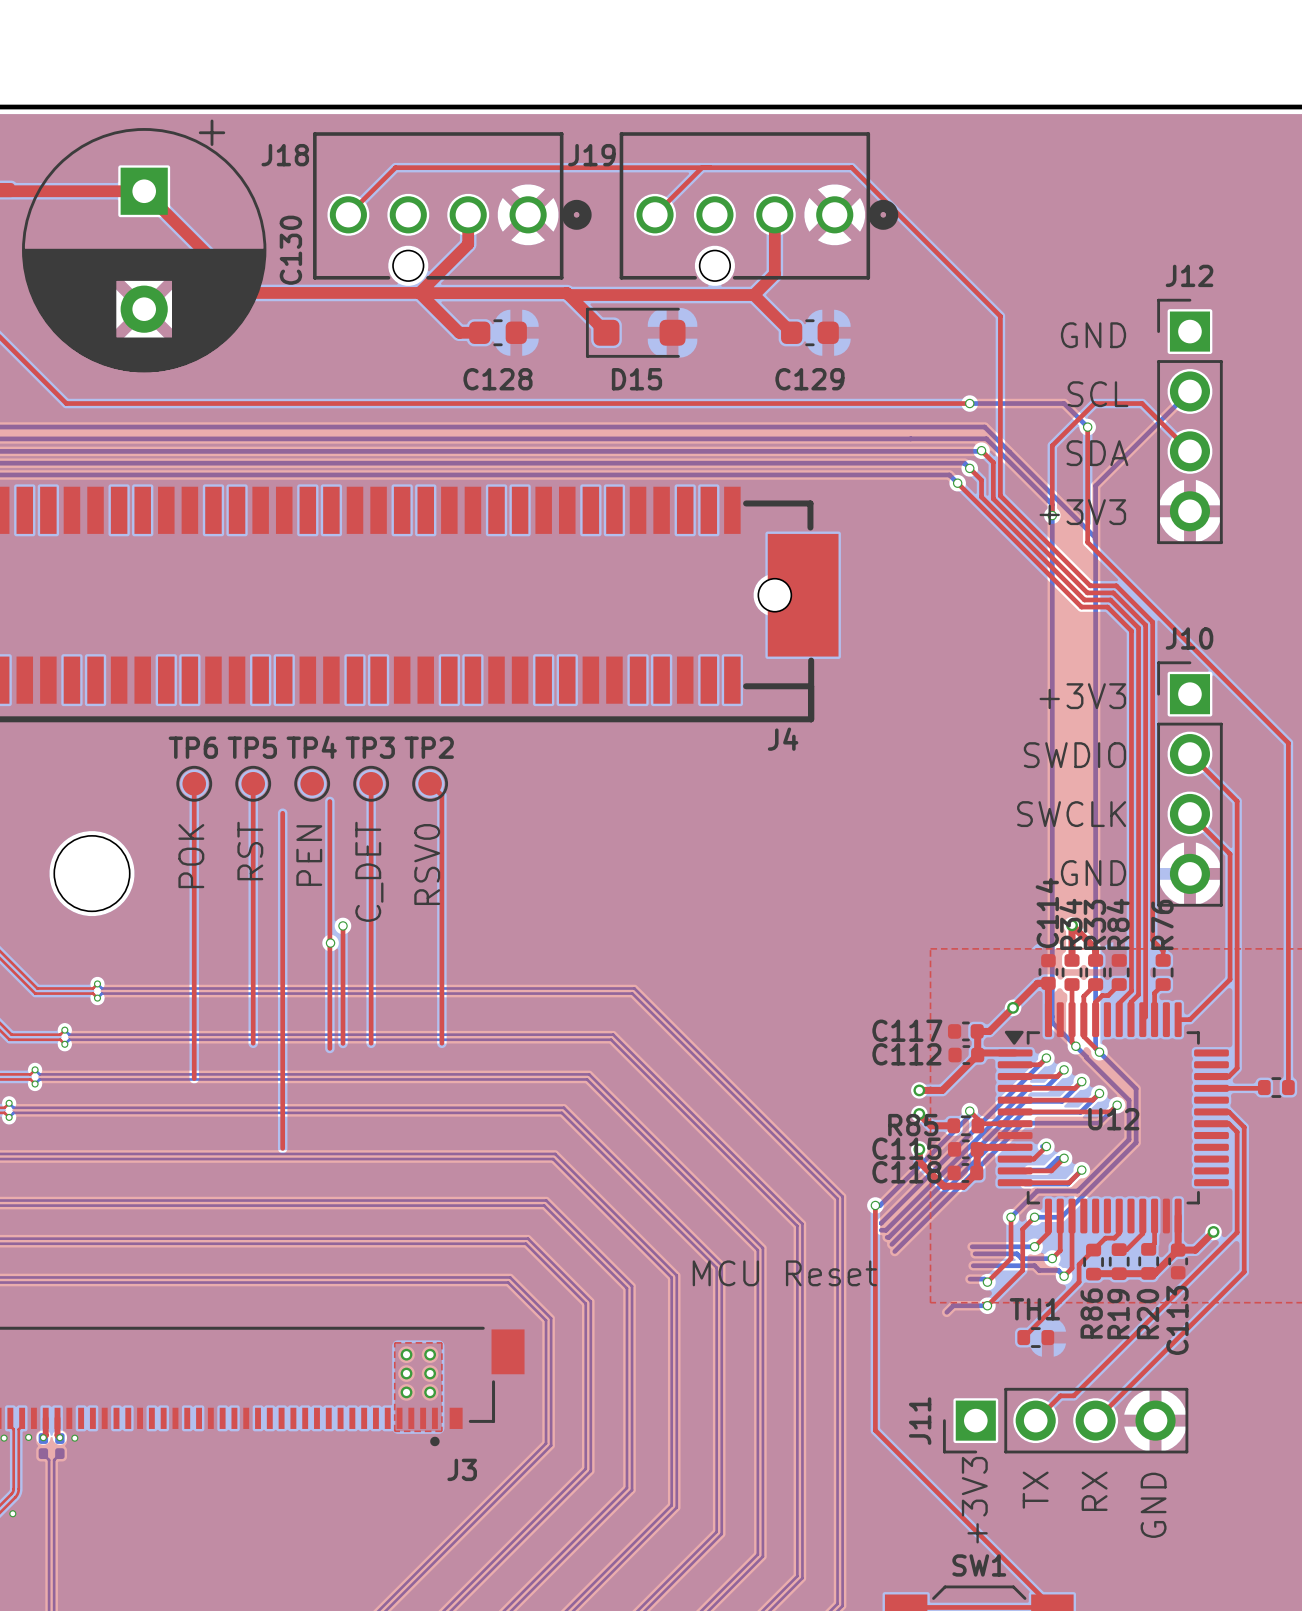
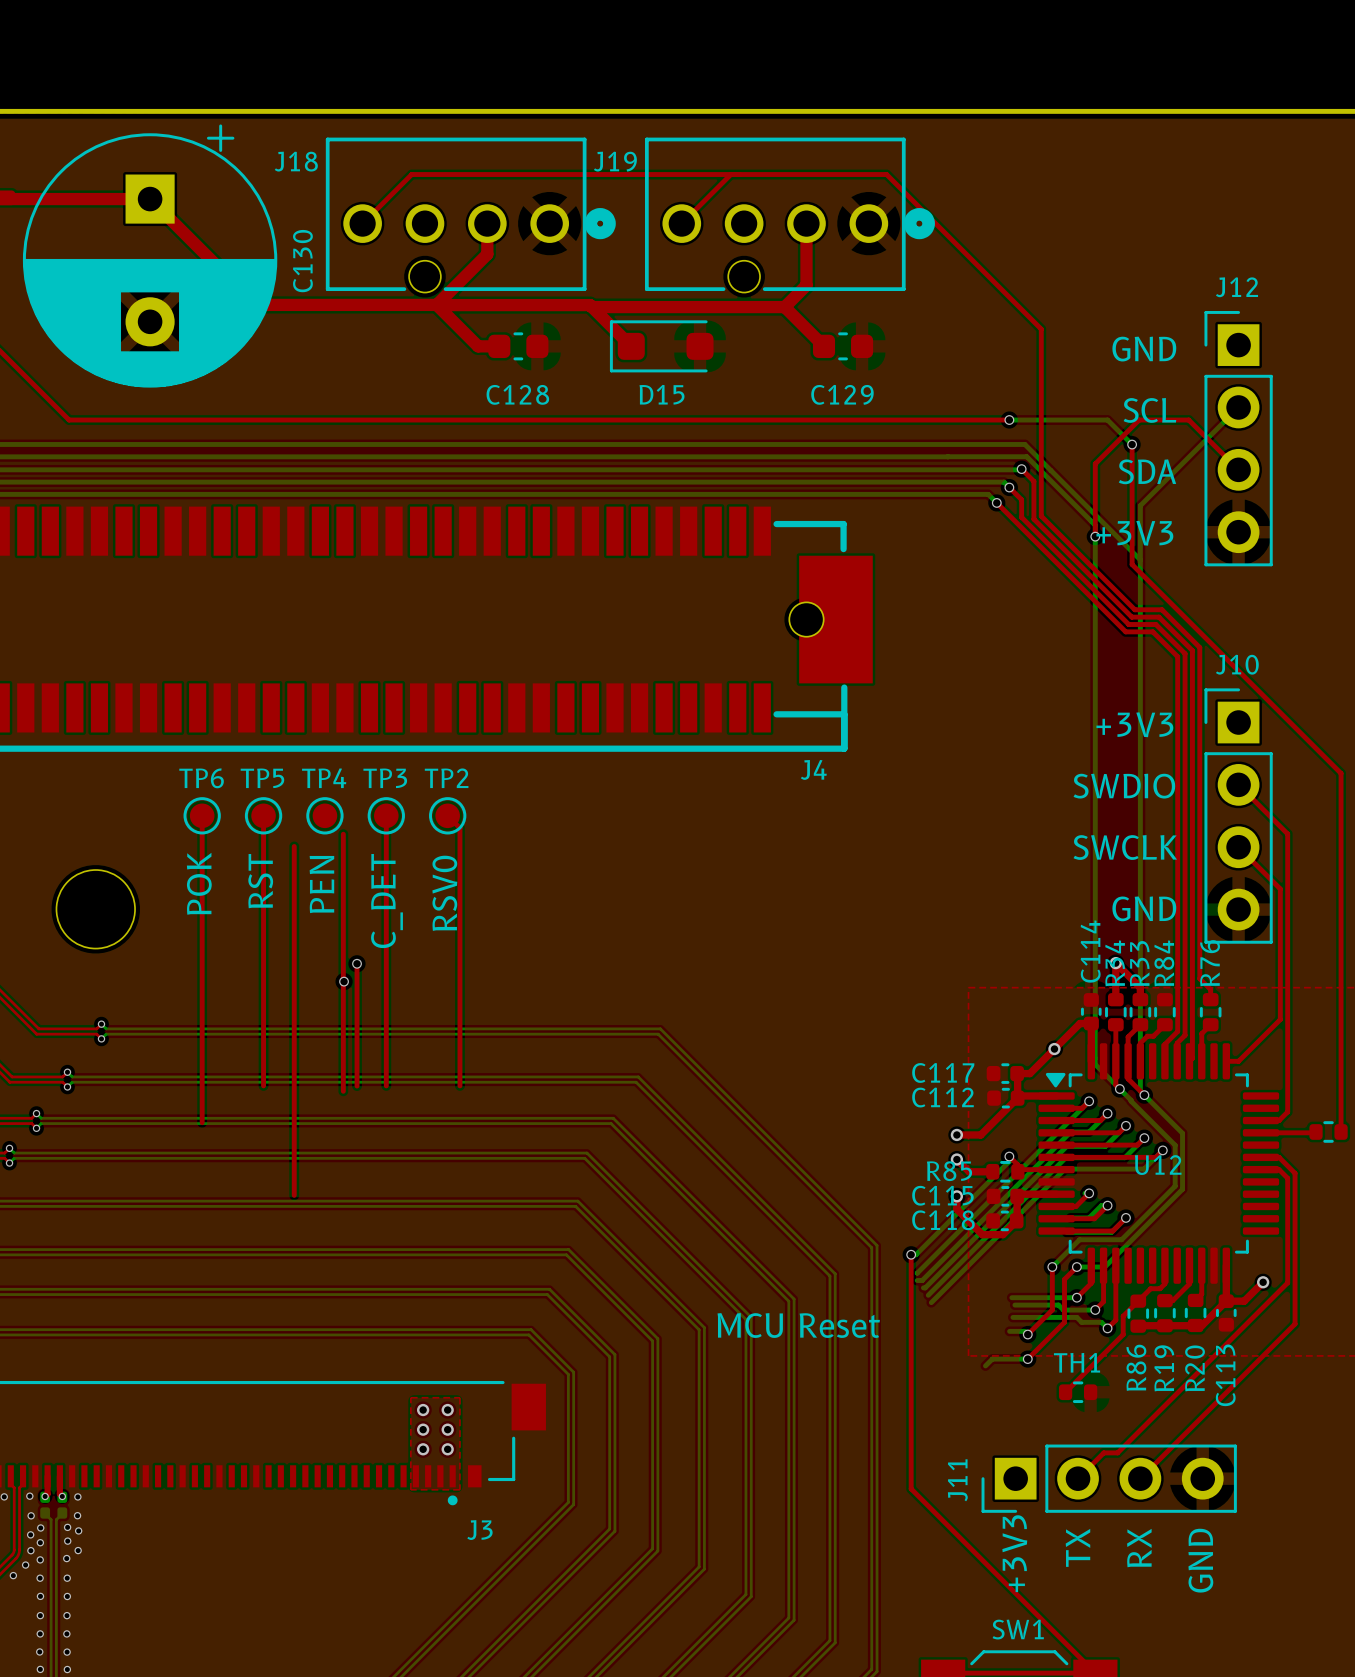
via: none -> (31, 1515)
via: none -> (77, 1515)
via: none -> (67, 1527)
via: none -> (40, 1527)
via: none -> (78, 1530)
via: none -> (30, 1534)
via: none -> (67, 1541)
via: none -> (40, 1542)
via: none -> (30, 1550)
via: none -> (78, 1550)
via: none -> (66, 1558)
via: none -> (40, 1559)
via: none -> (25, 1565)
via: none -> (40, 1578)
via: none -> (67, 1578)
via: none -> (40, 1596)
via: none -> (67, 1596)
via: none -> (40, 1615)
via: none -> (66, 1615)
via: none -> (40, 1633)
via: none -> (66, 1633)
via: none -> (39, 1651)
via: none -> (67, 1652)
via: none -> (40, 1669)
via: none -> (67, 1669)

